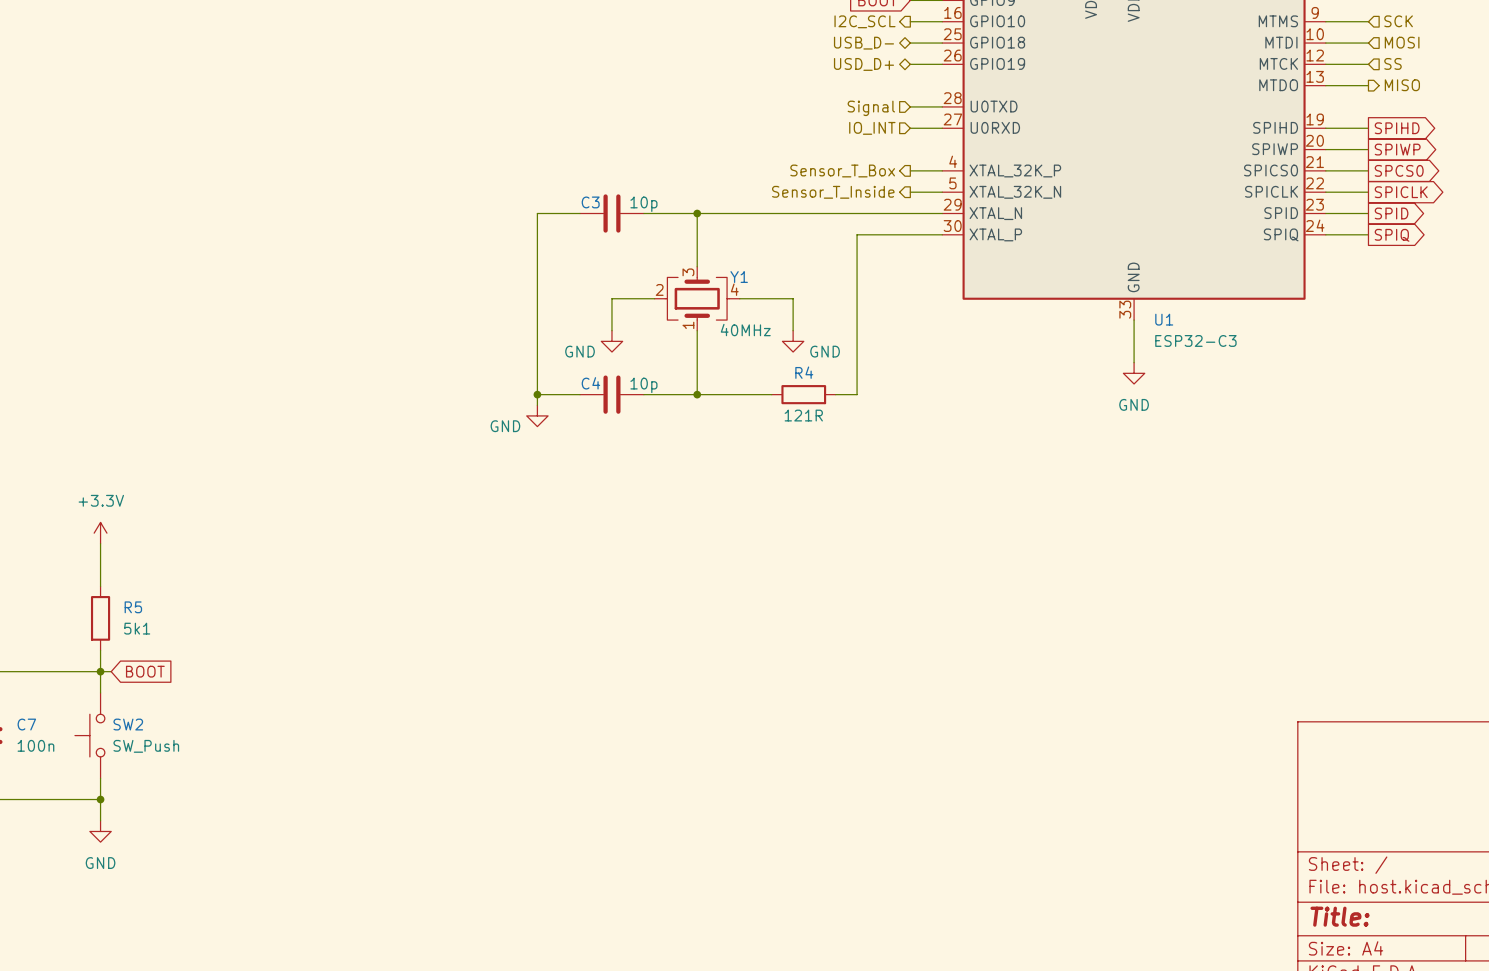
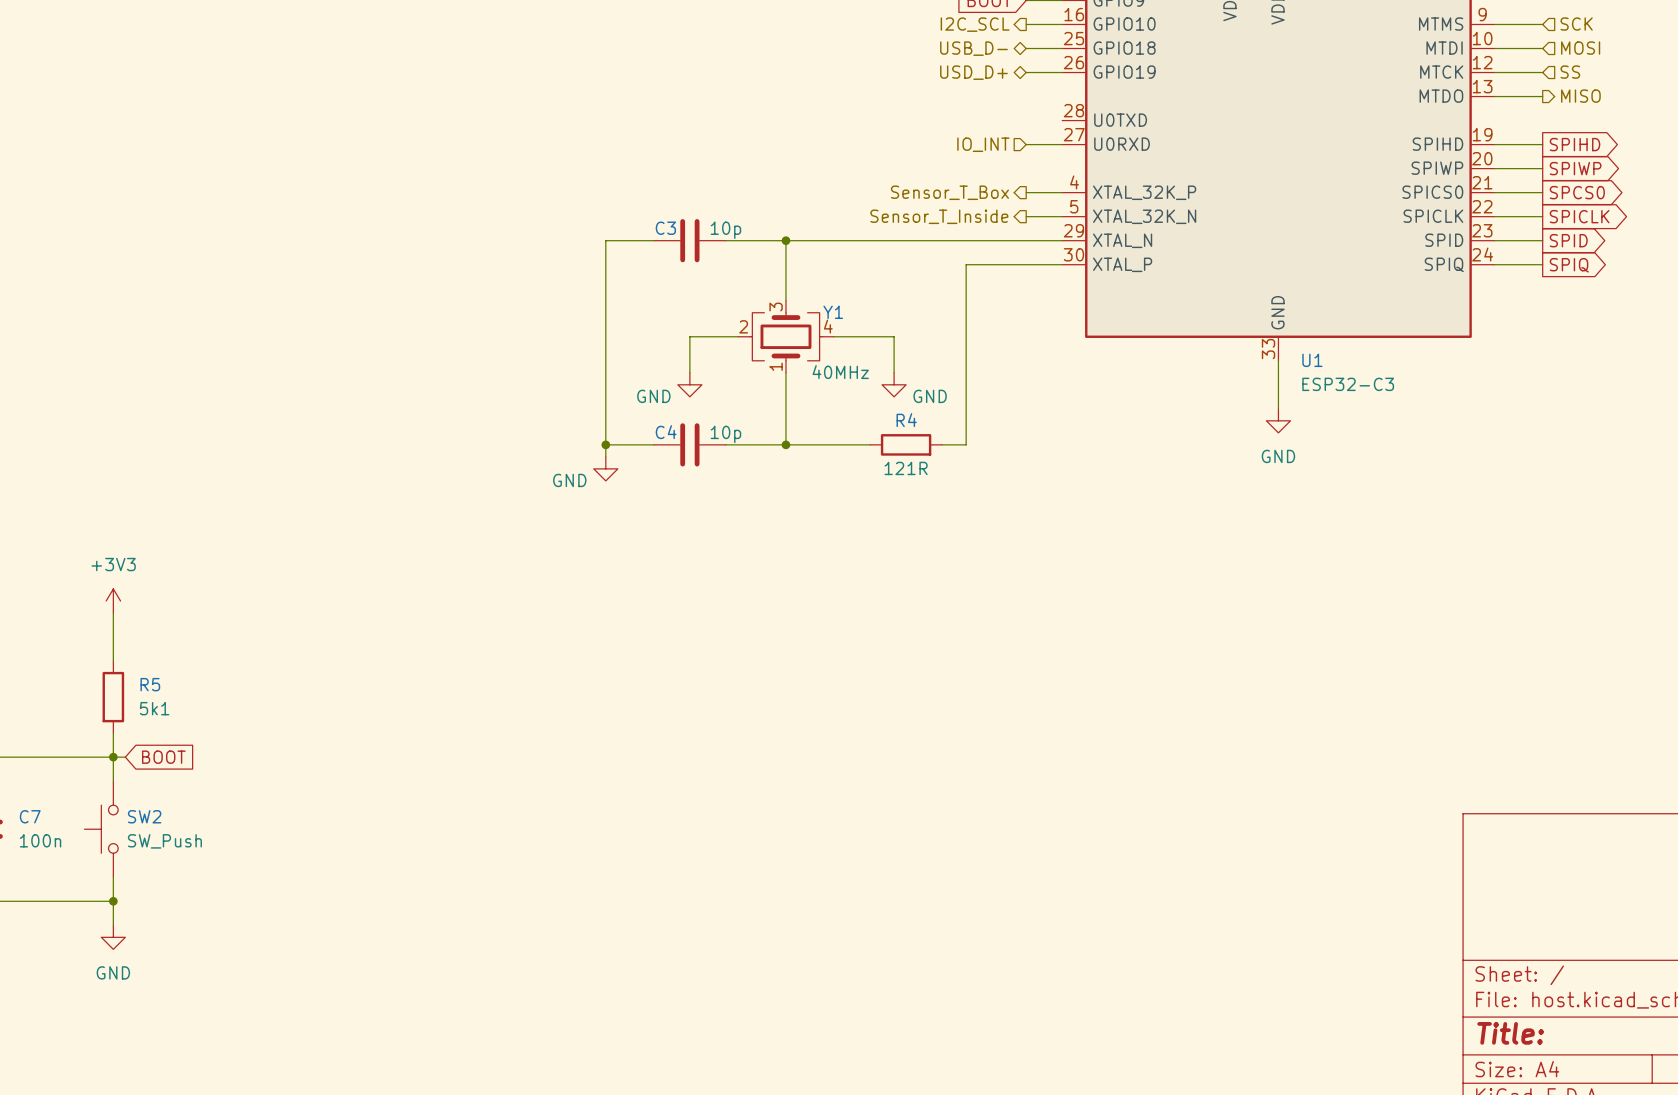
wire: (910, 106) (942, 106) -> none
hierarchical label: Signal (871, 108) -> none
power symbol: +3.3V (100, 533) -> +3V3 (113, 601)

